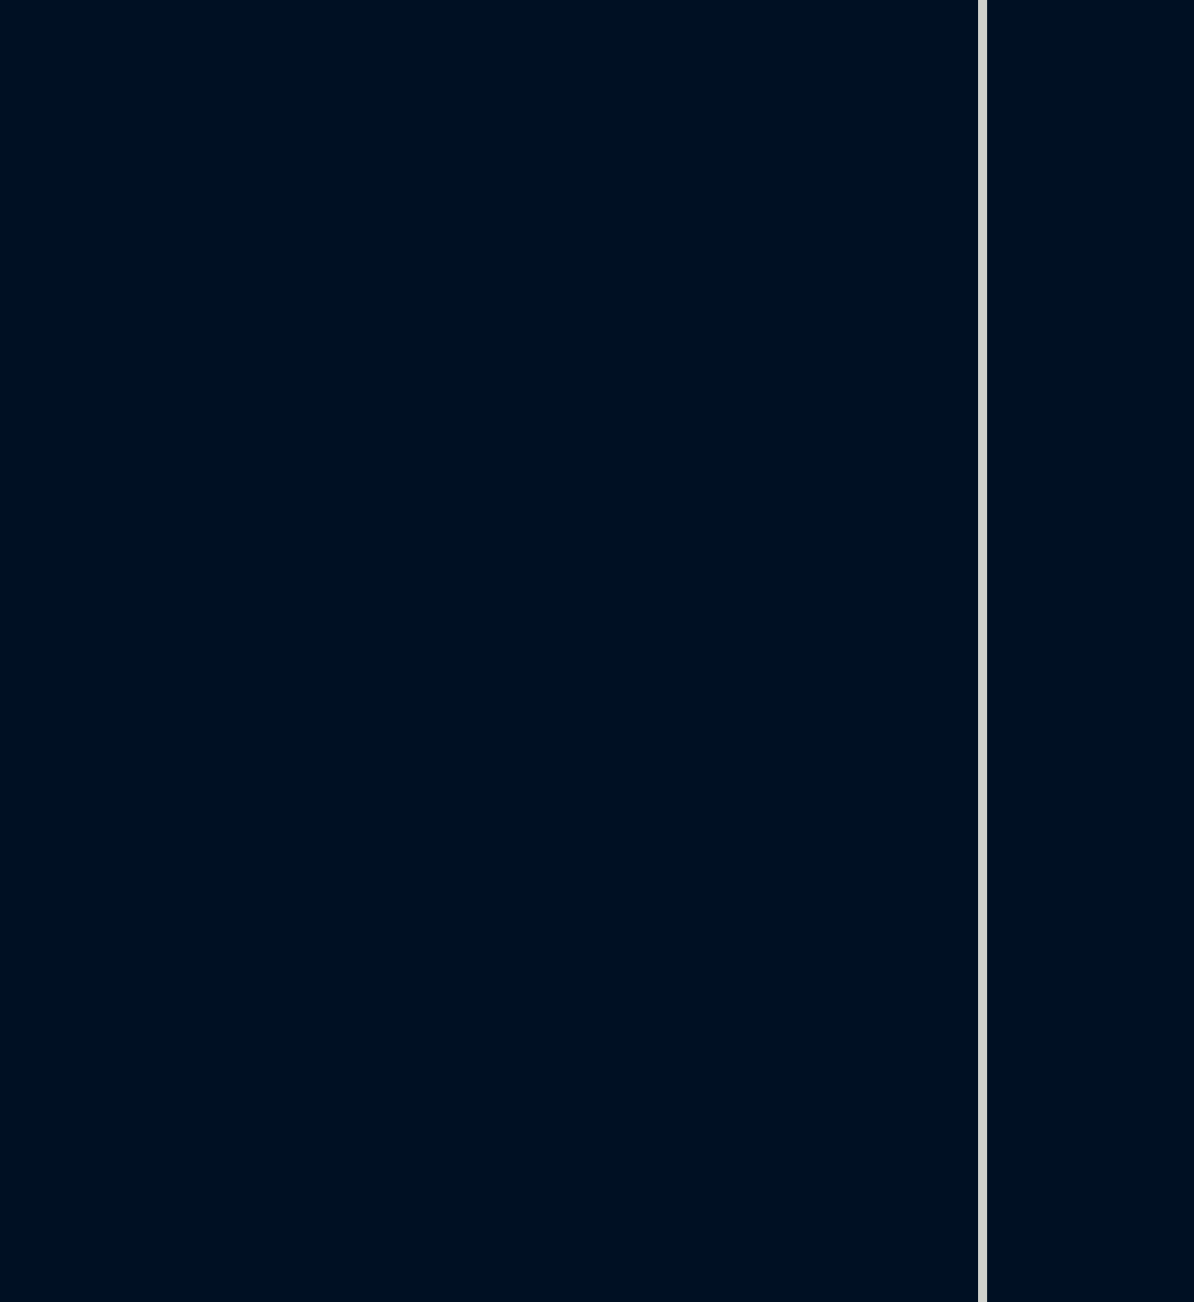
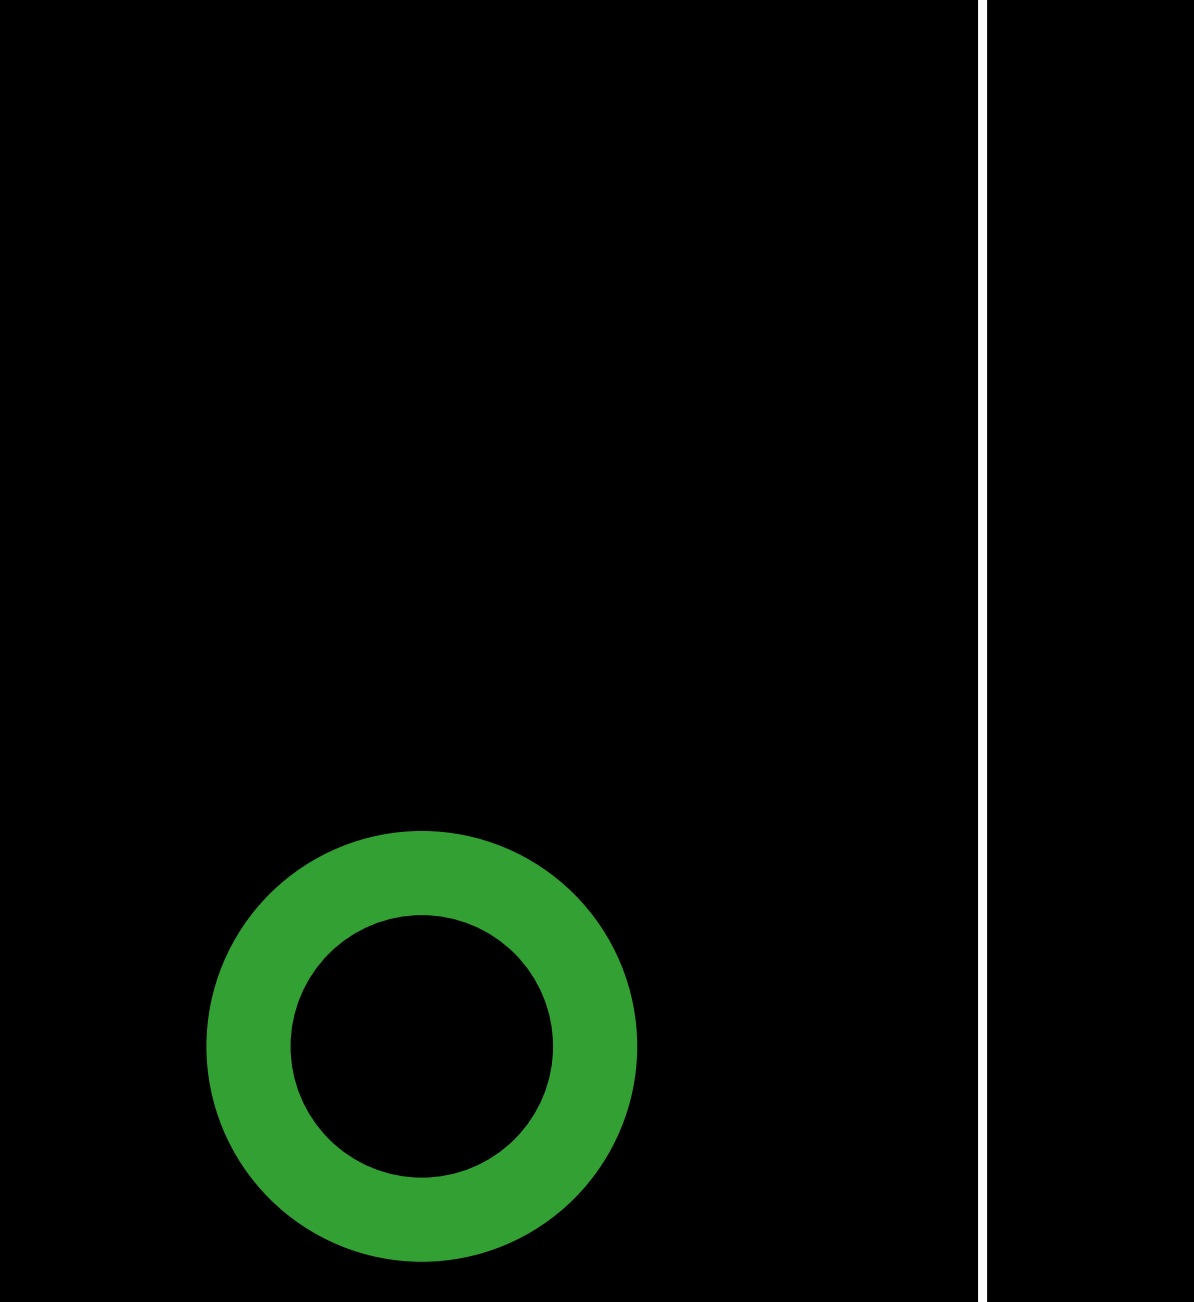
part: none -> (421, 1046)

